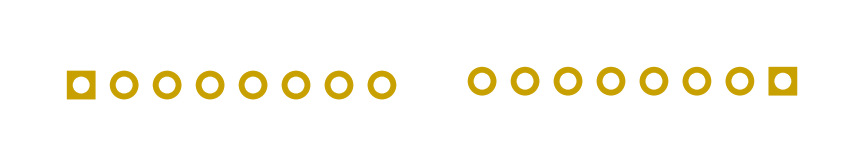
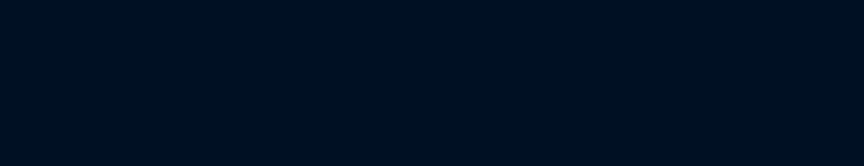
part: (632, 81) -> none
part: (231, 85) -> none

